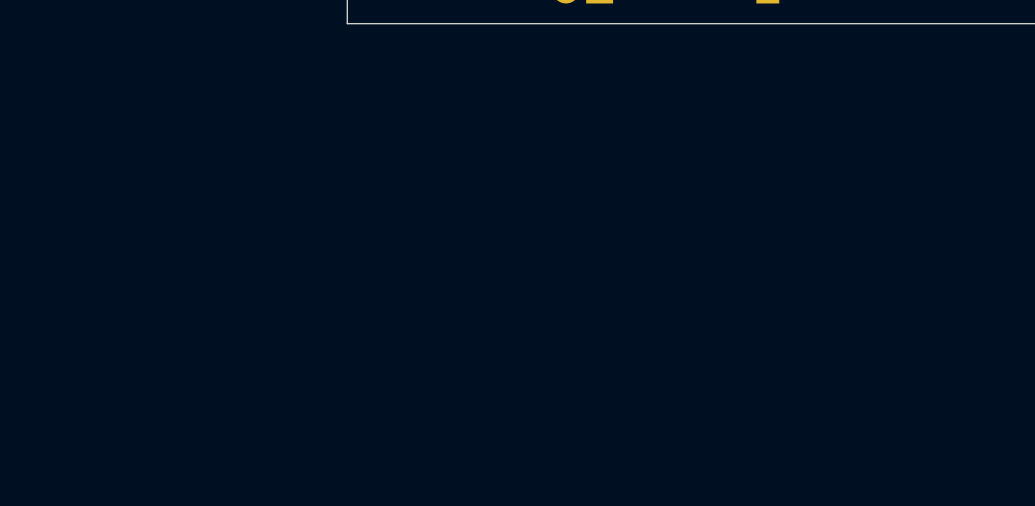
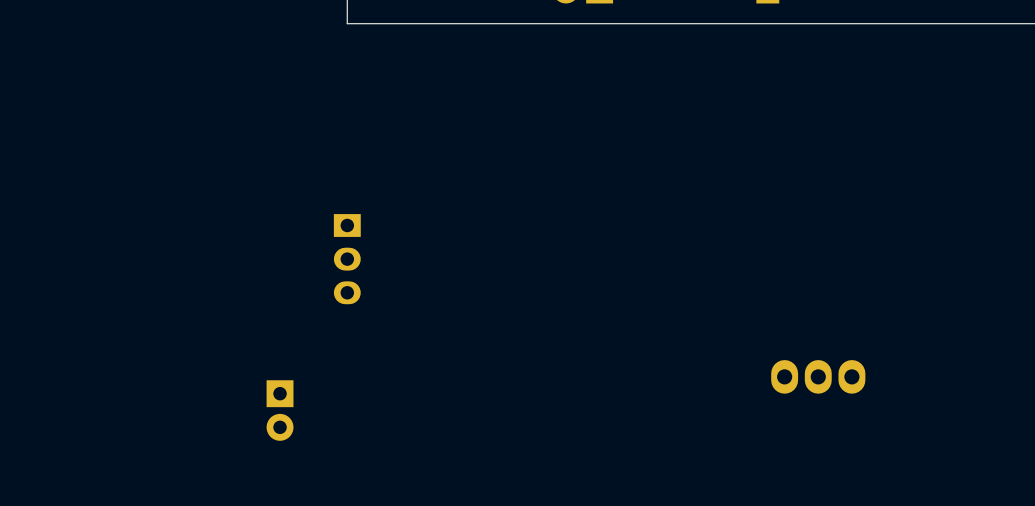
part: none -> (347, 259)
part: none -> (818, 376)
part: none -> (280, 410)

